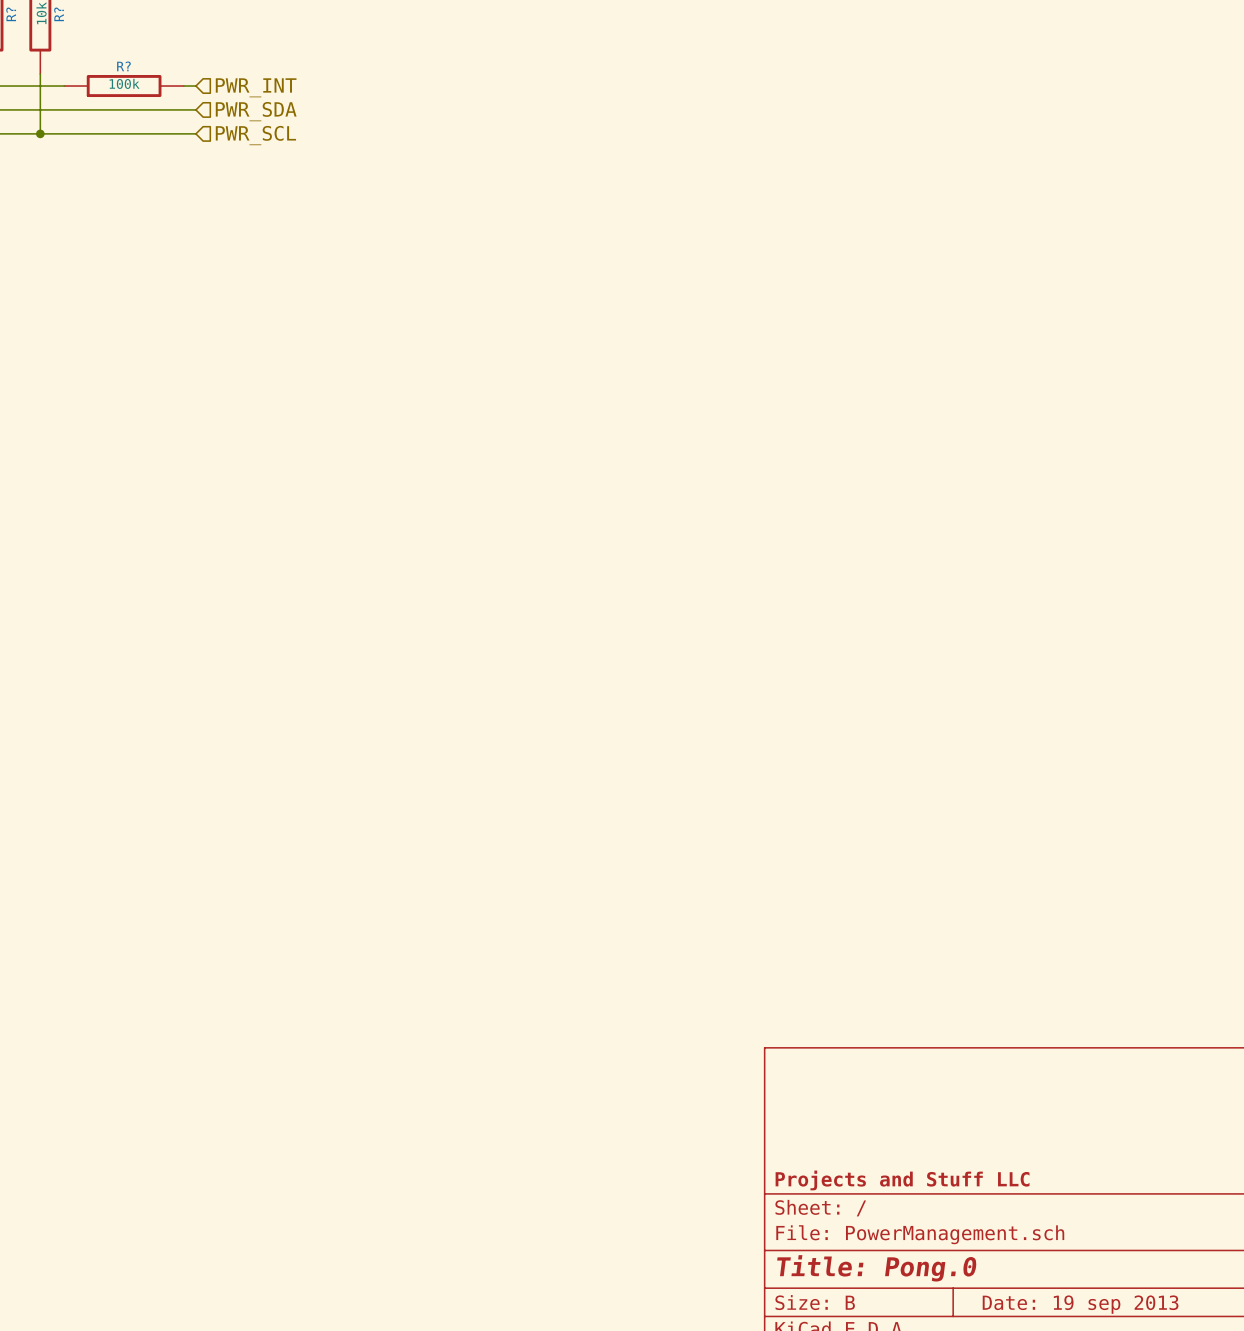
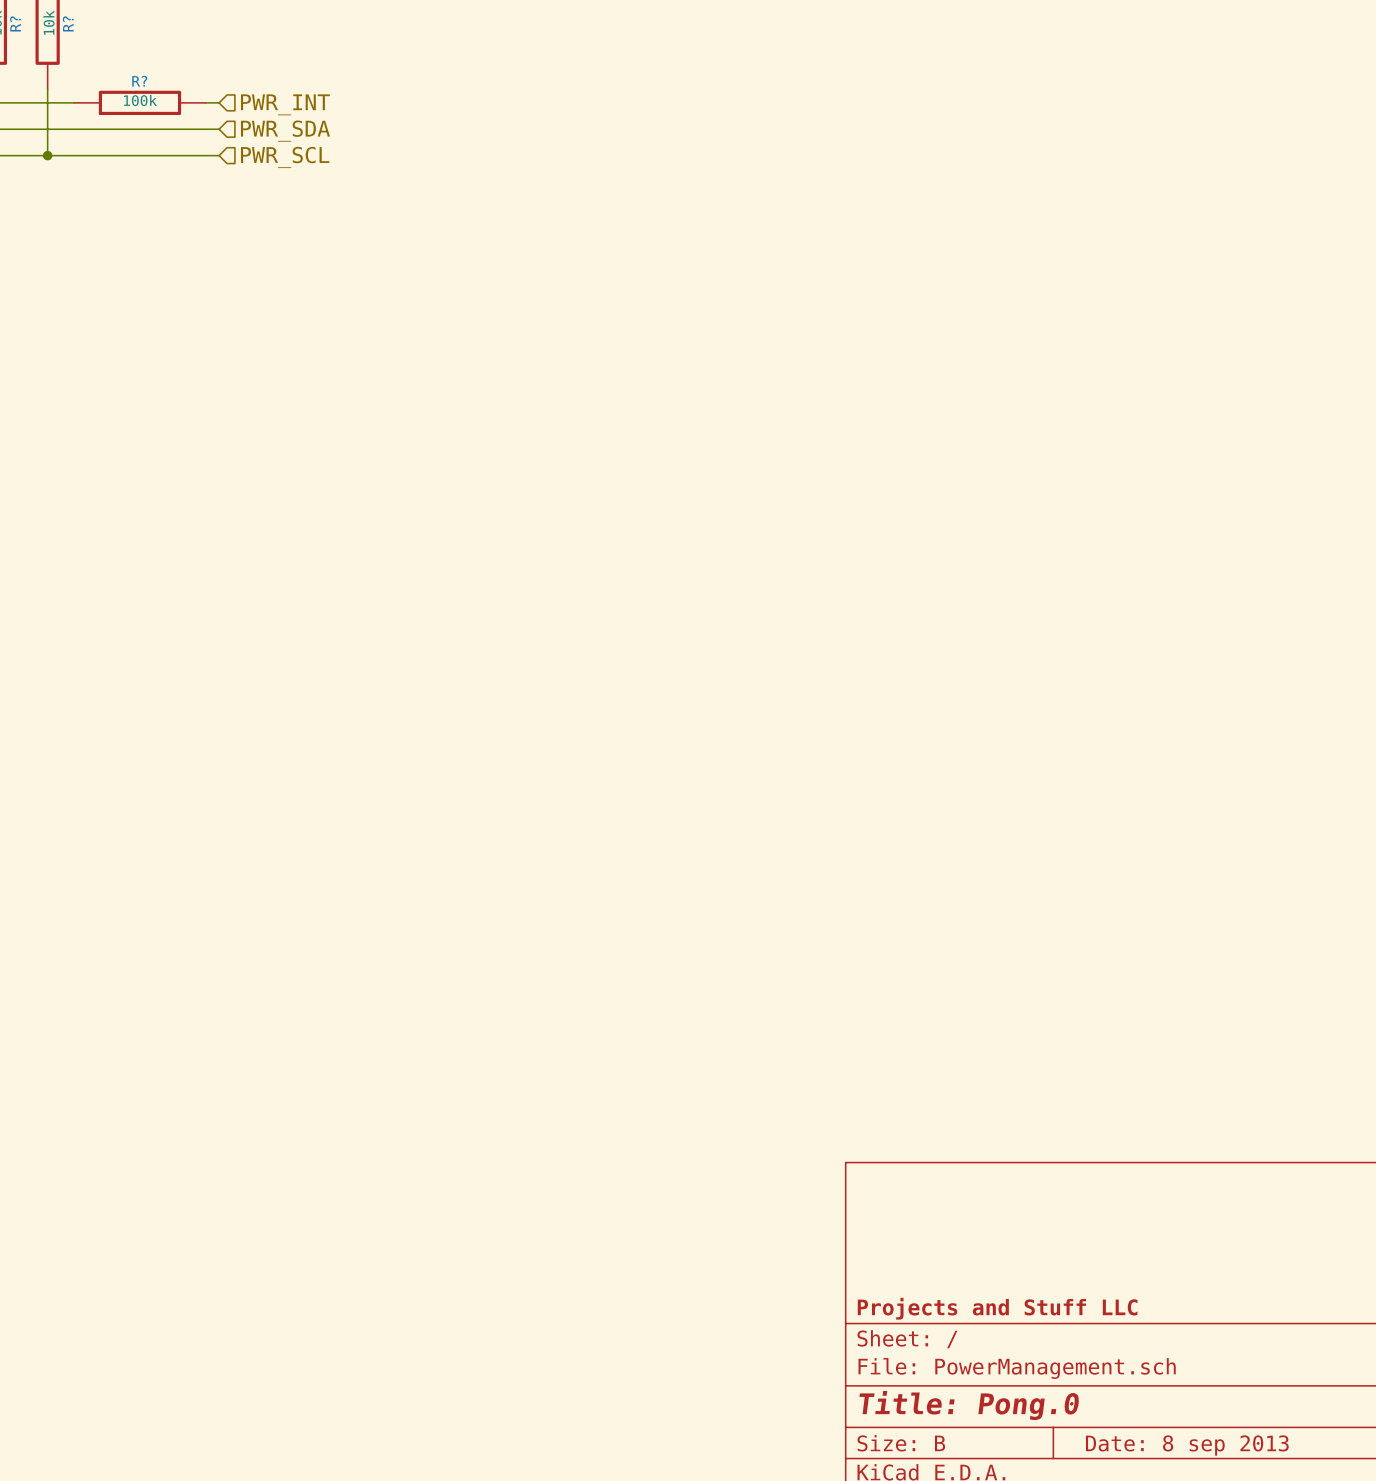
title block: Date: 19 sep 2013 (1080, 1304) -> Date: 8 sep 2013 (1187, 1445)

